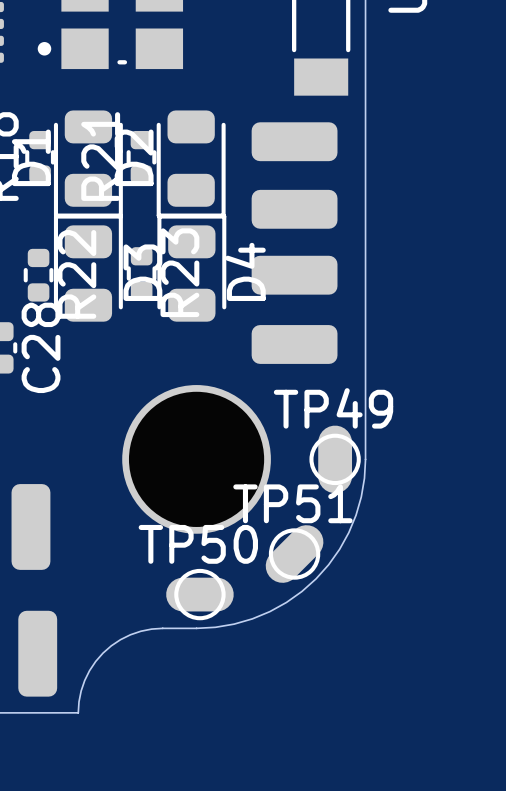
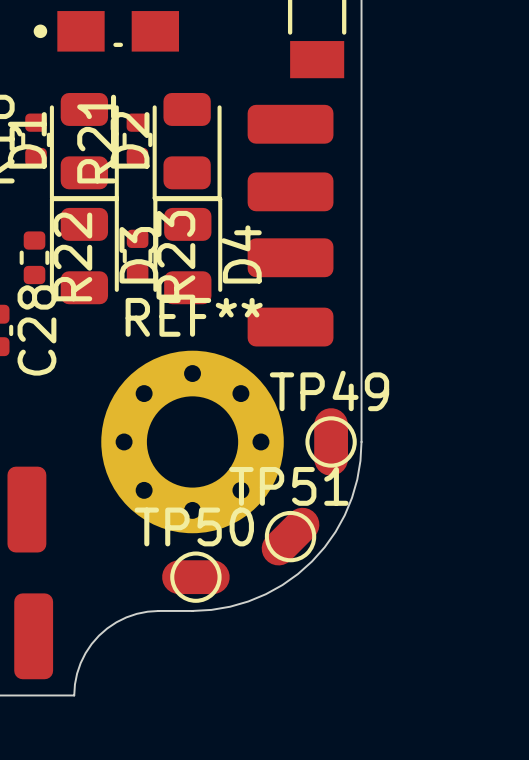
part: (196, 459) -> none
REF**: none -> (192, 441)

